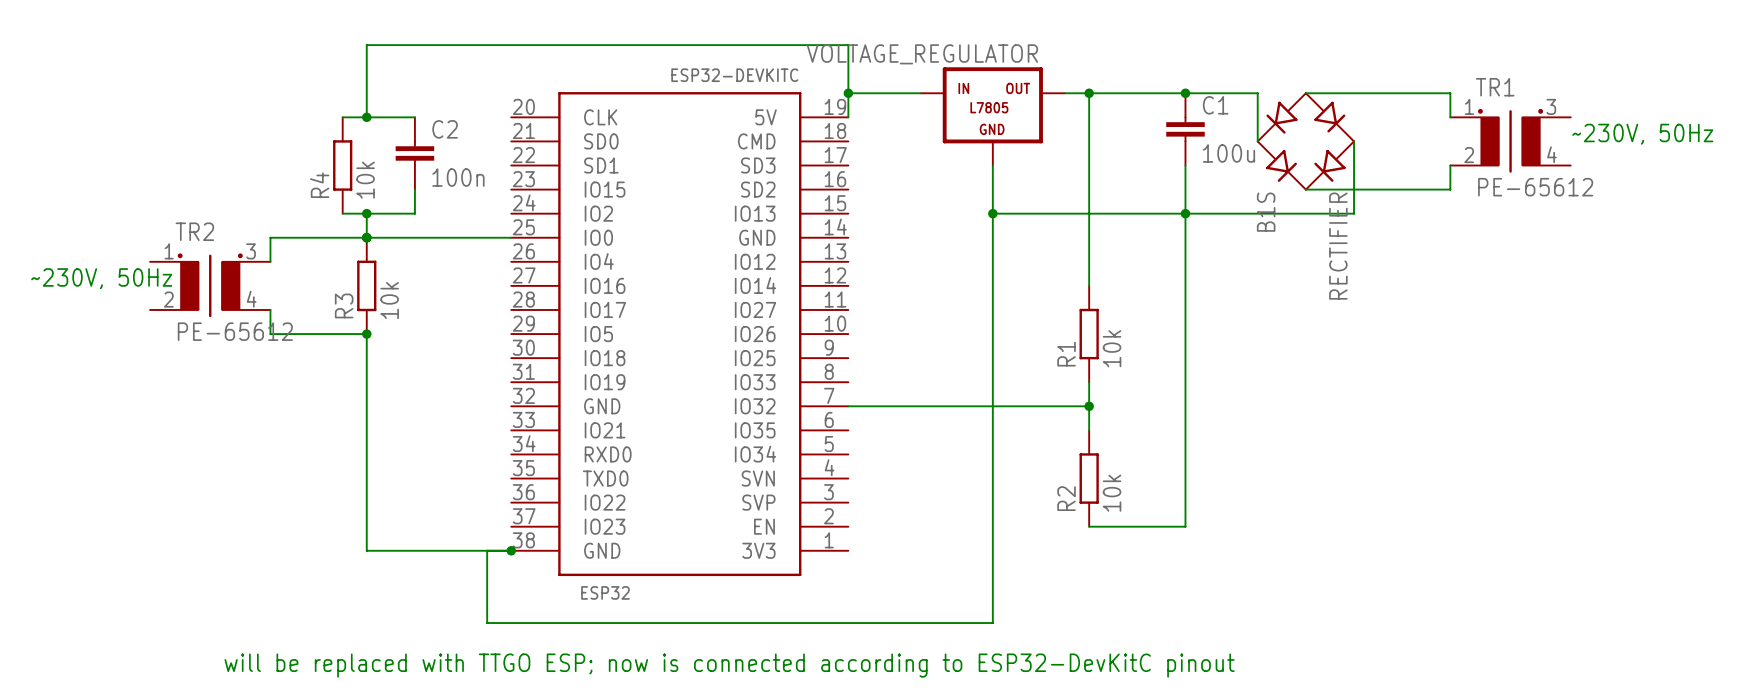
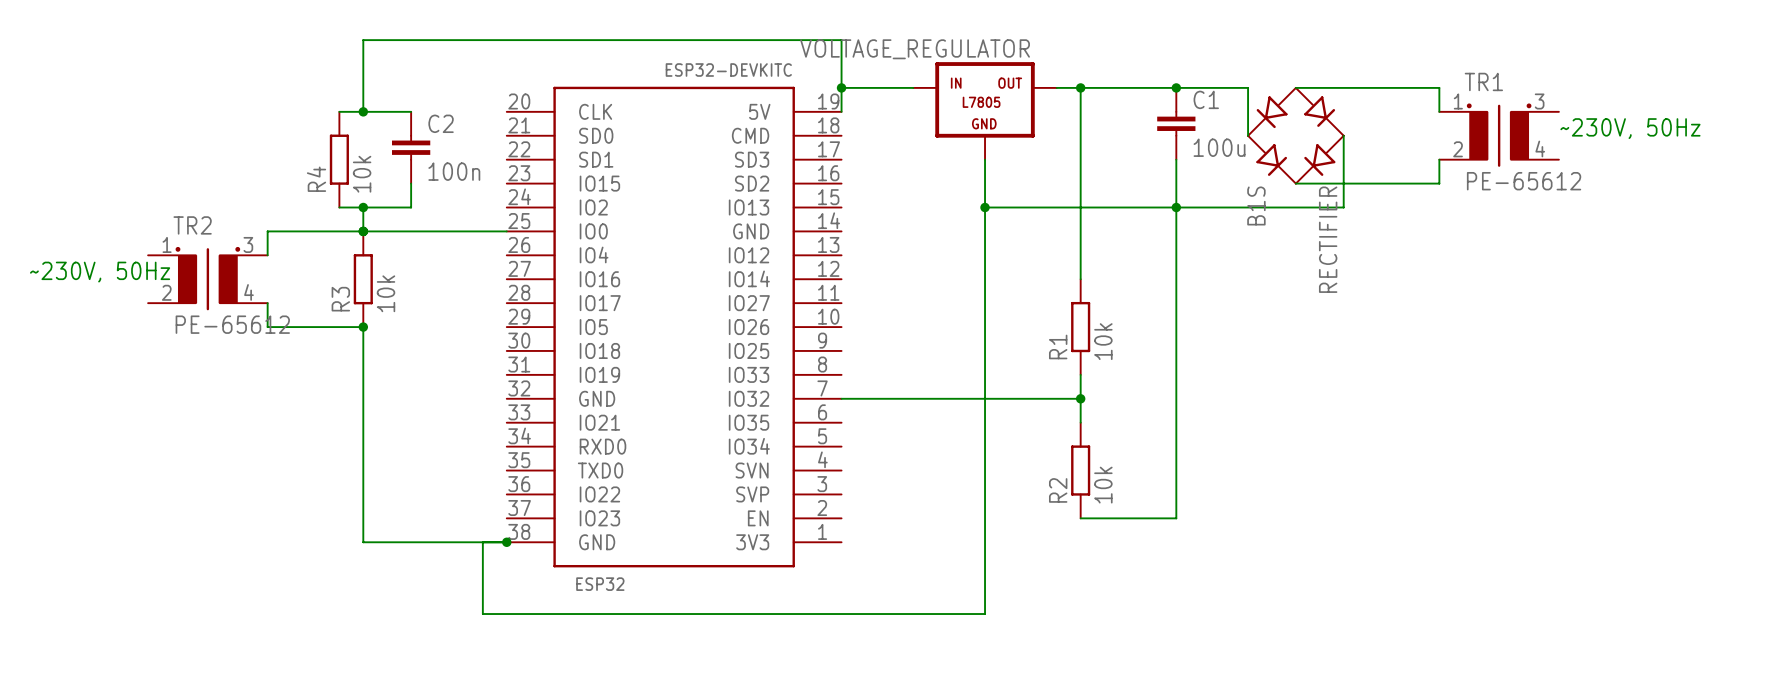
text: will be replaced with TTGO ESP; now is connected according to ESP32-DevKitC pinout (729, 665) -> none

